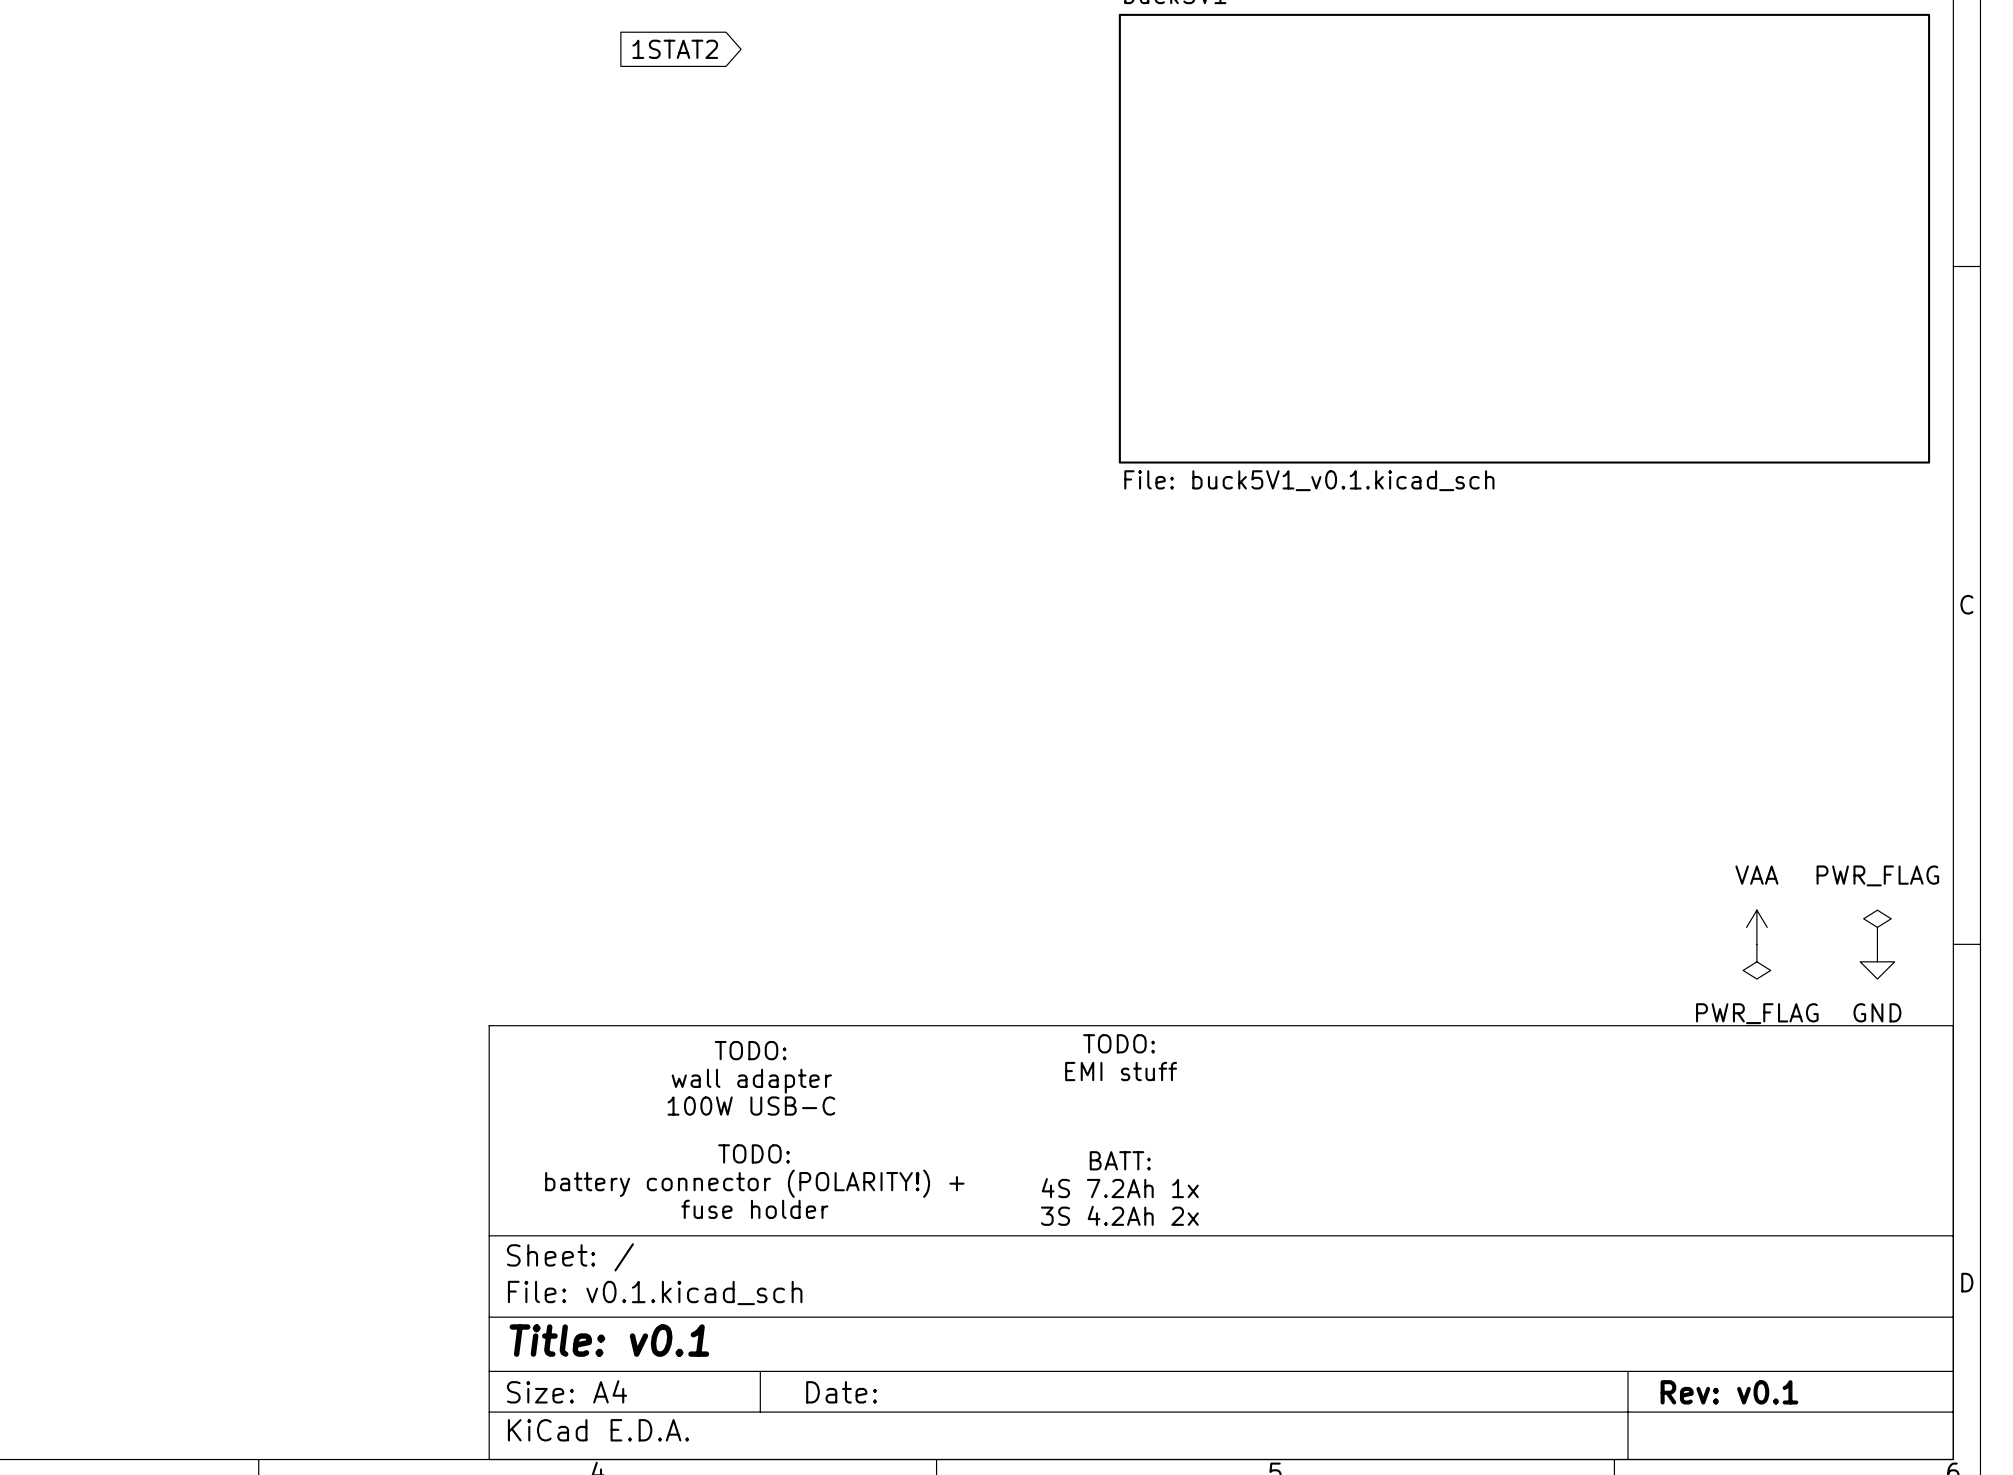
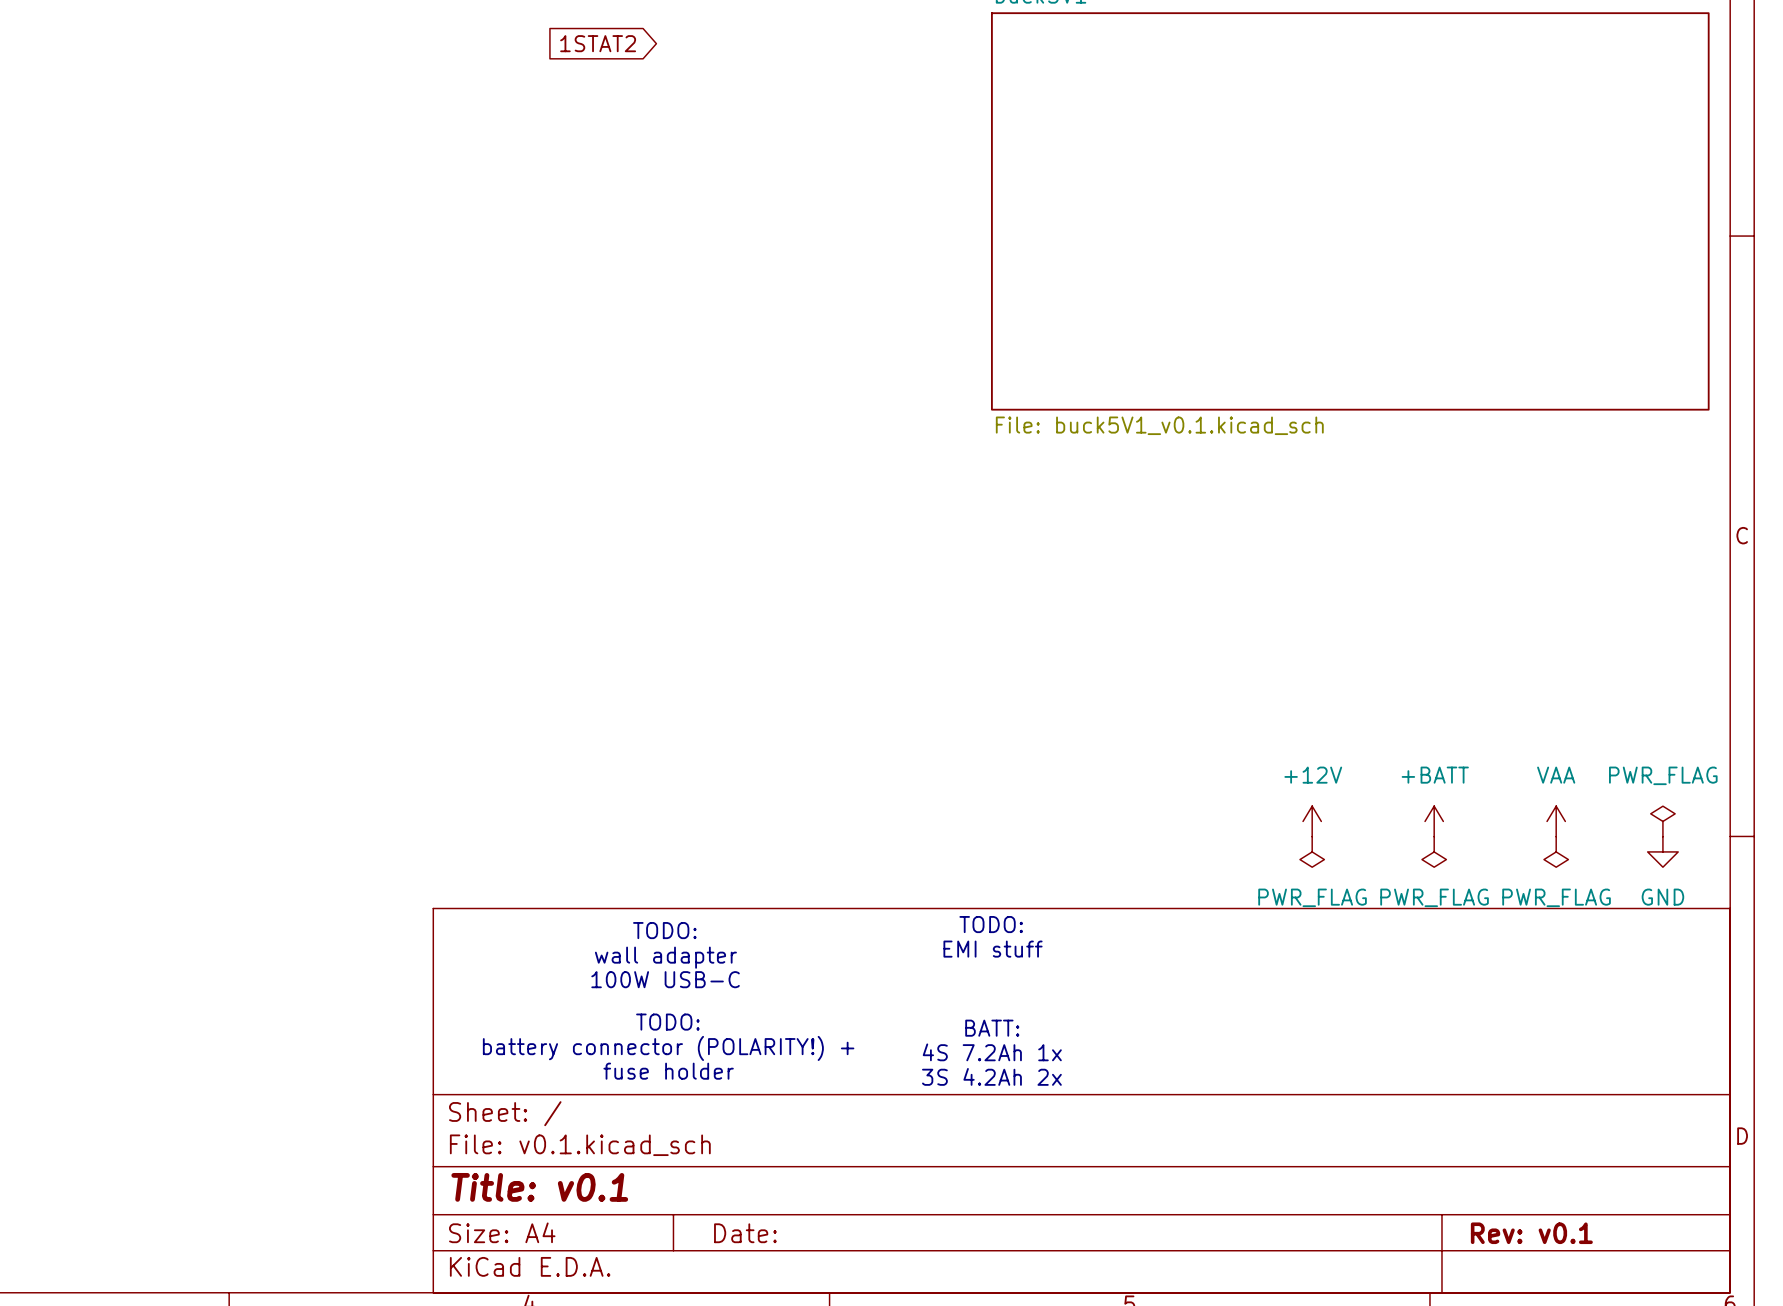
power symbol: none -> +12V (1312, 821)
power symbol: none -> +BATT (1434, 821)
power symbol: none -> PWR_FLAG (1312, 851)
power symbol: none -> PWR_FLAG (1434, 851)

